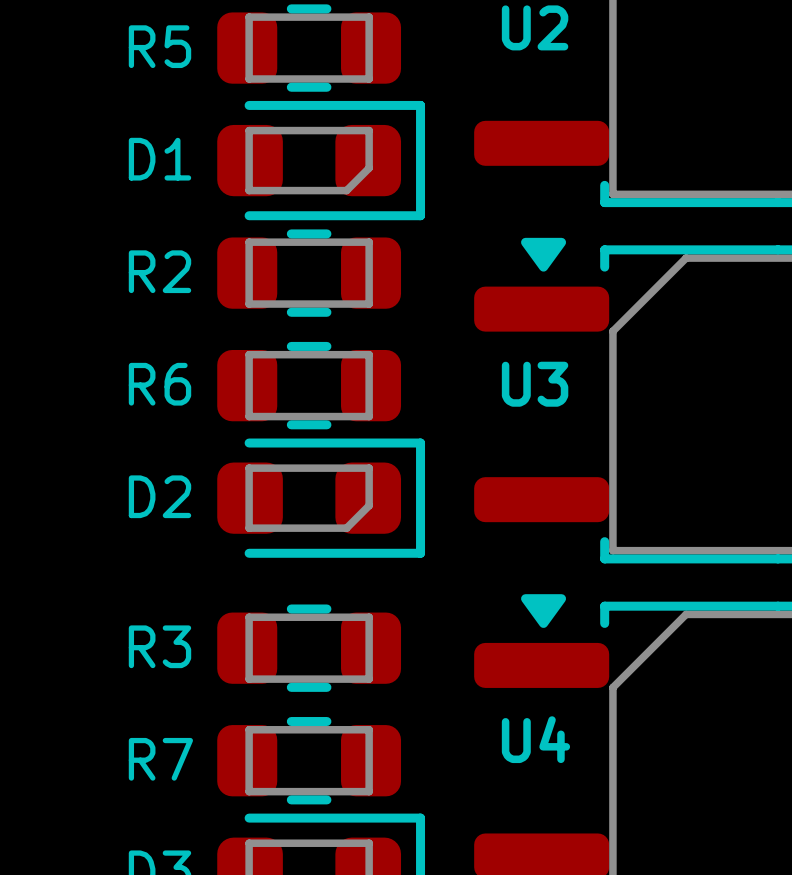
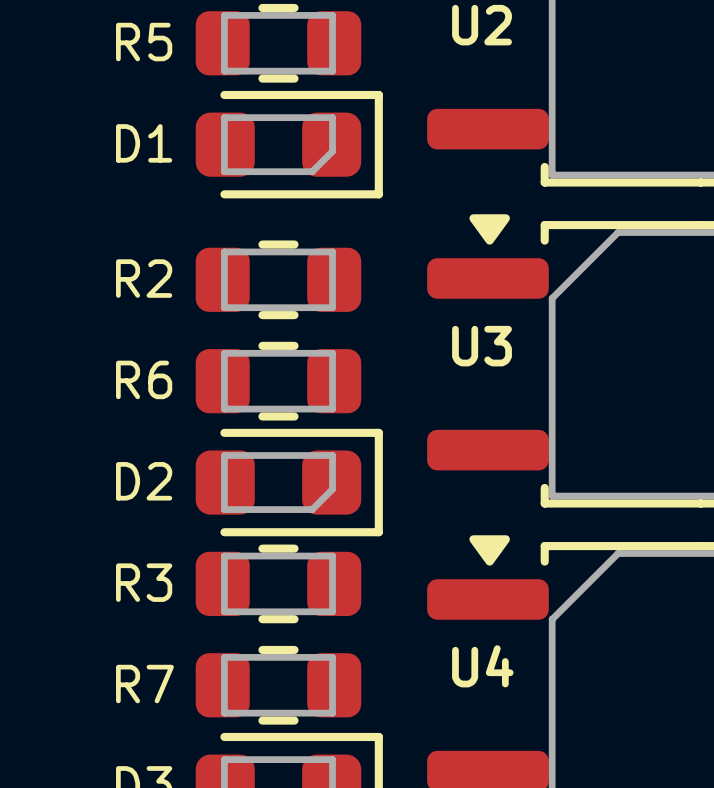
R2 position: (309, 273) -> (278, 279)
R6 position: (309, 385) -> (278, 381)
D2 position: (321, 498) -> (289, 482)

